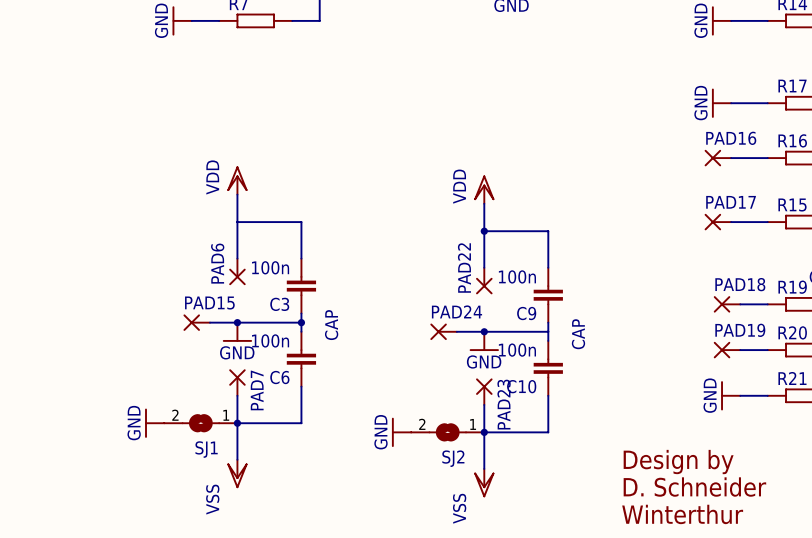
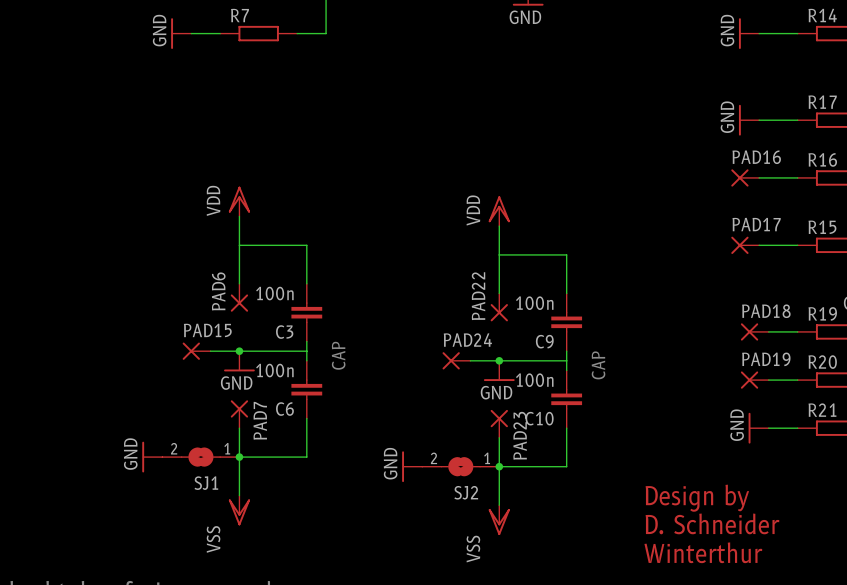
junction: (484, 231) -> none
junction: (301, 322) -> none

